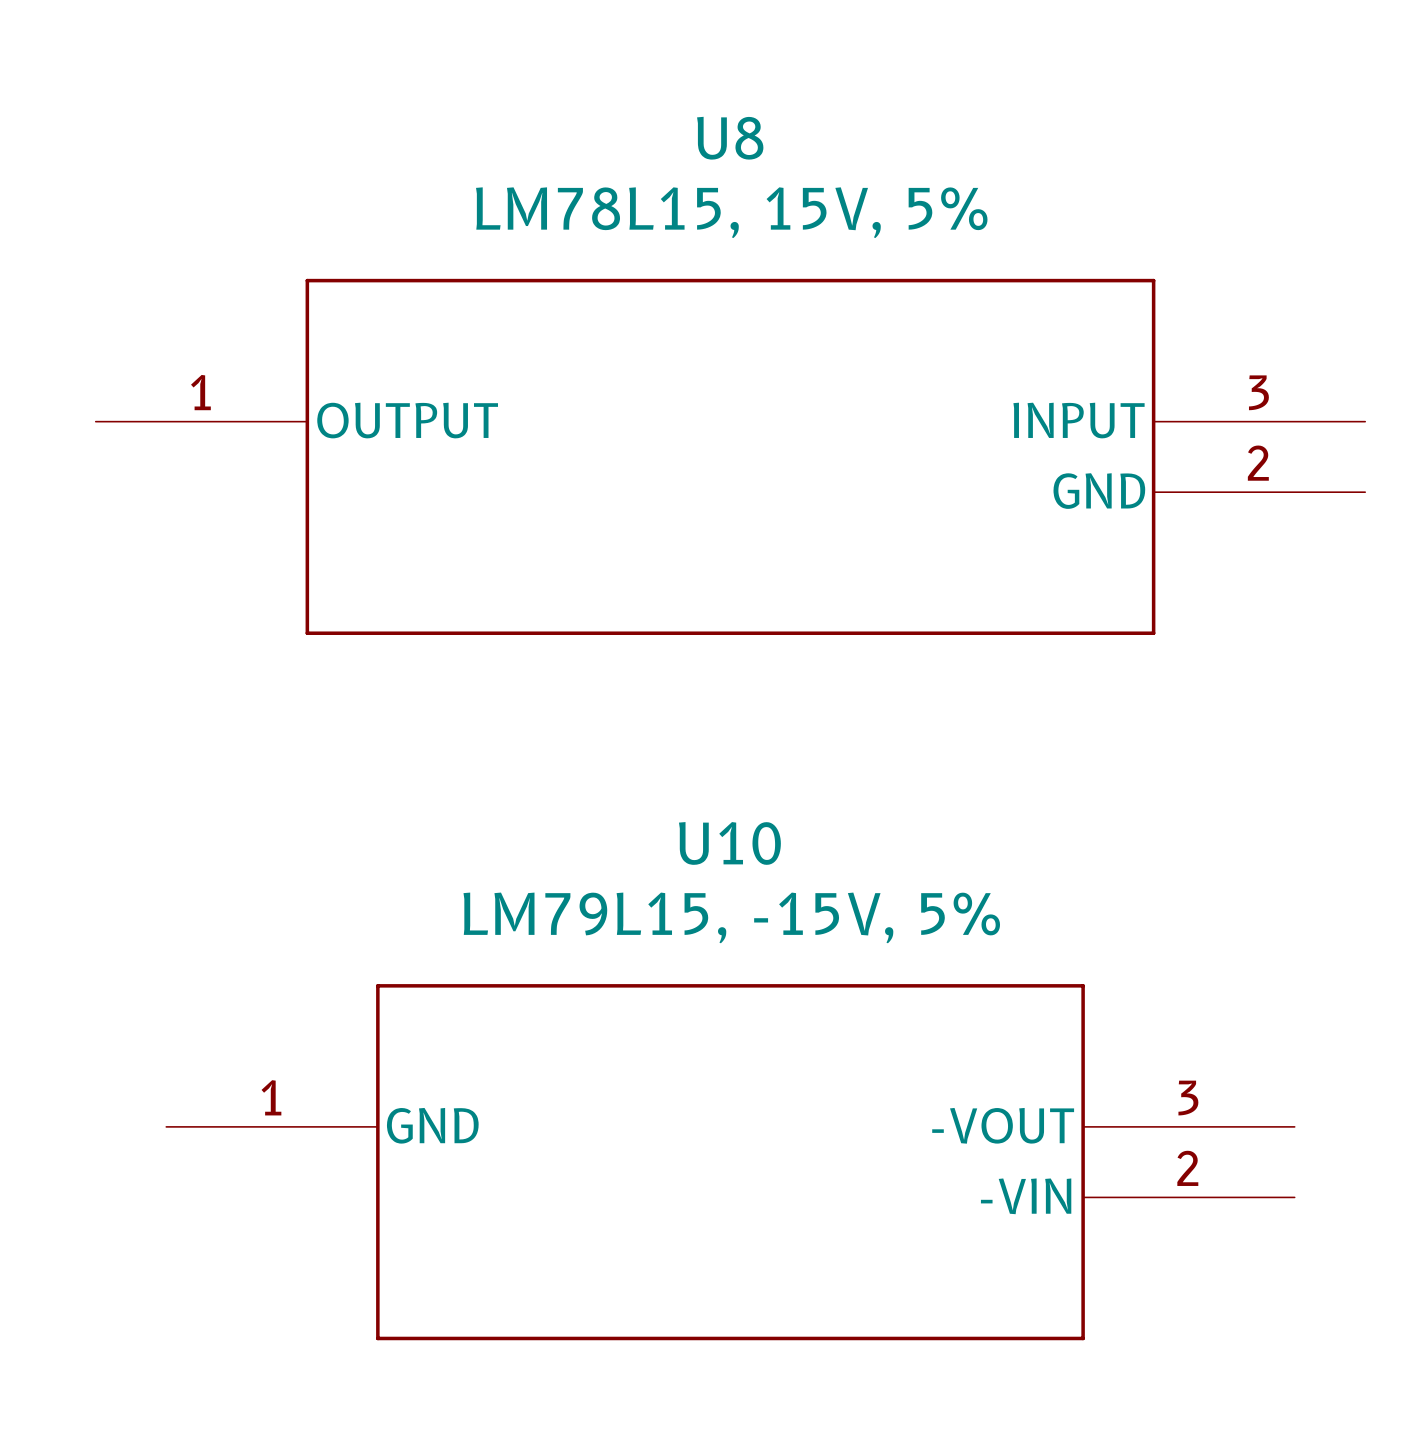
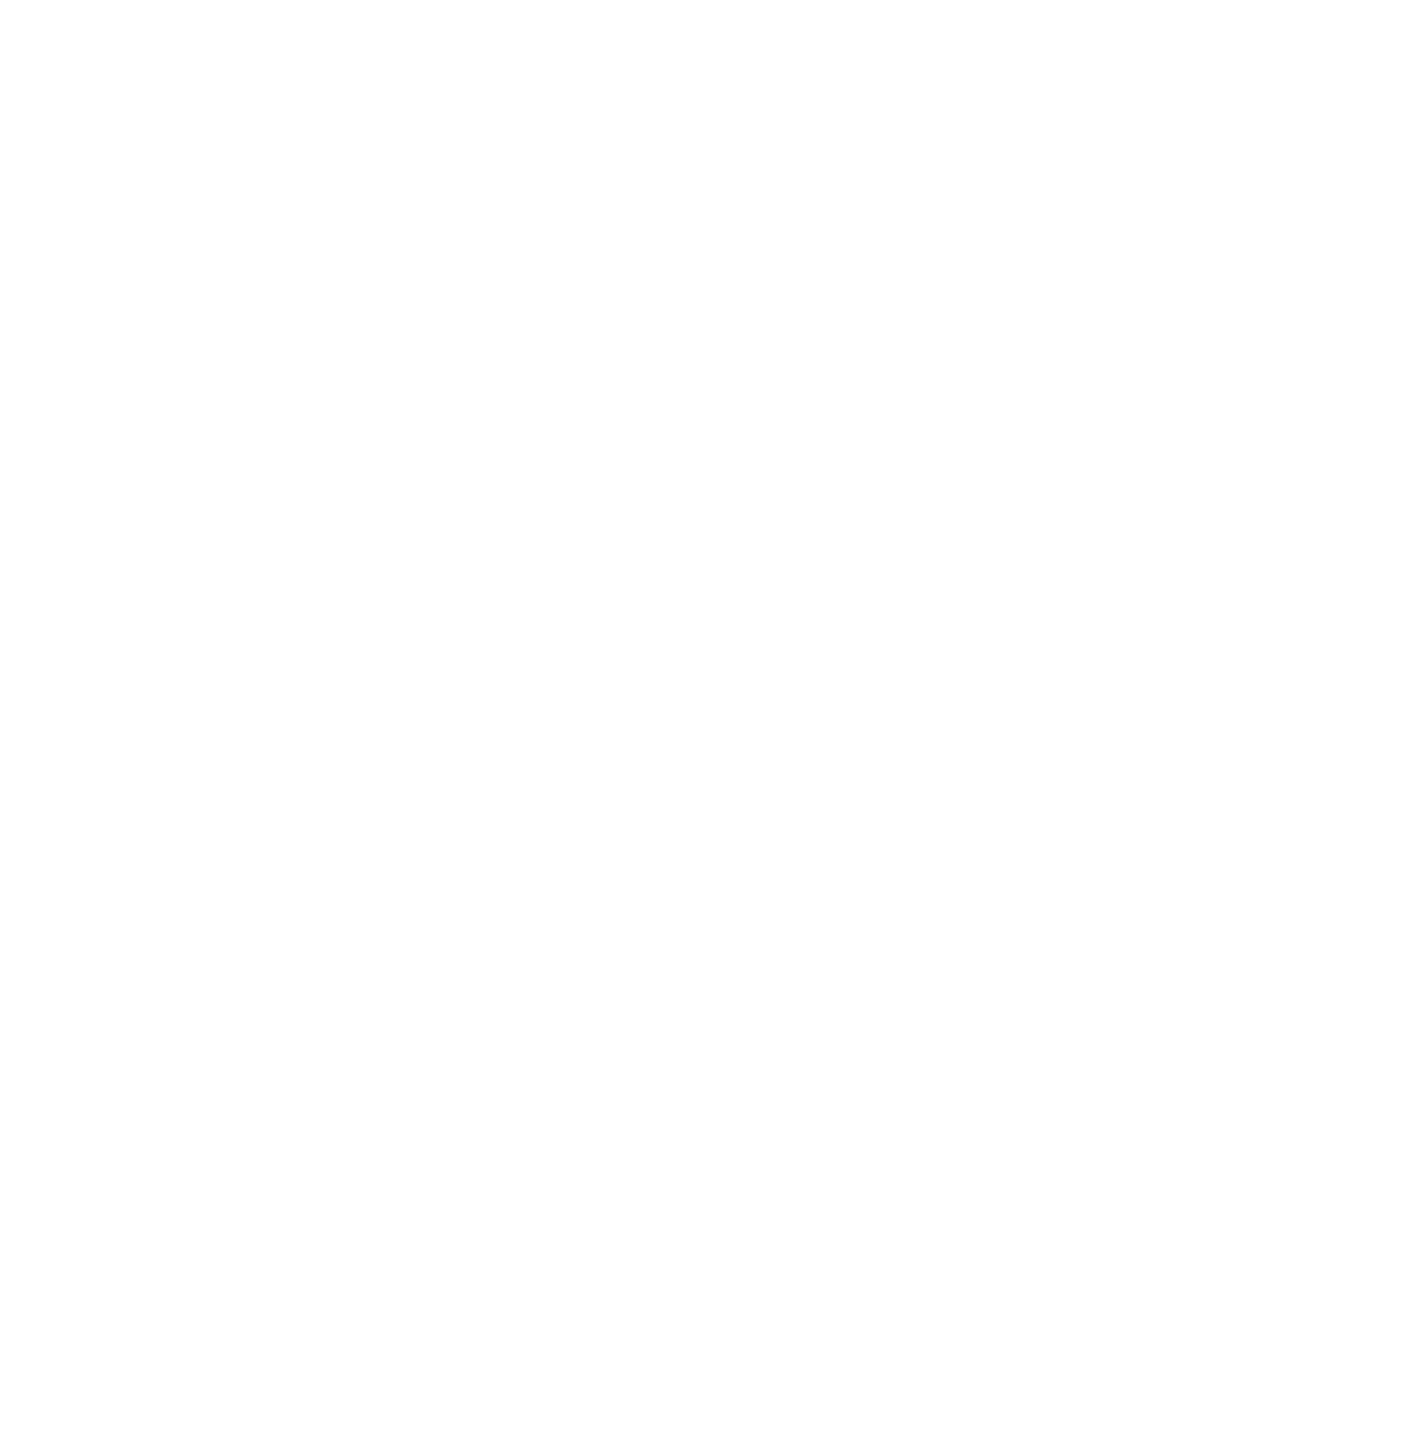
U8: LM78L15, 15V, 5% (730, 456) -> none
U10: LM79L15, -15V, 5% (730, 1162) -> none

